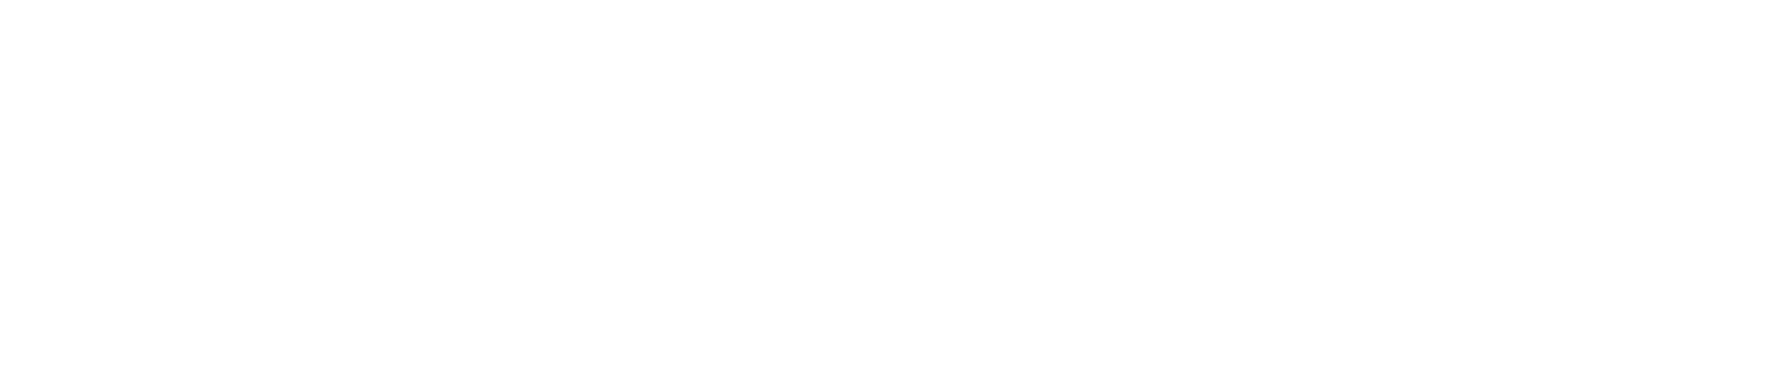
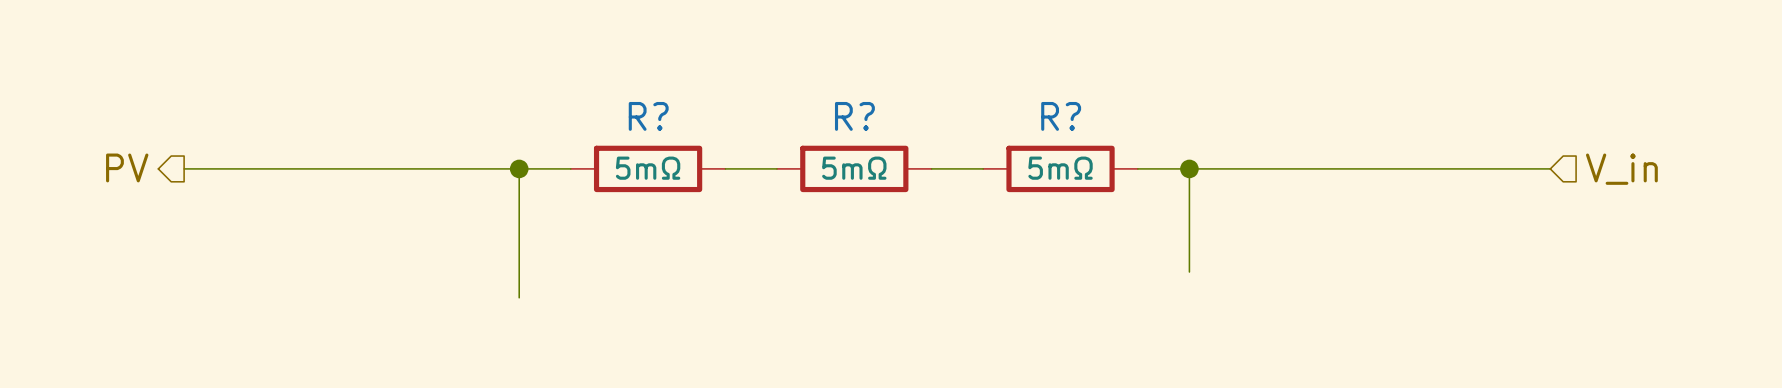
hierarchical label: none -> PV (127, 167)
wire: none -> (184, 168) (570, 168)
wire: none -> (519, 168) (519, 297)
junction: none -> (519, 168)
R?: none -> 5mΩ (648, 168)
wire: none -> (725, 168) (776, 168)
R?: none -> 5mΩ (854, 168)
wire: none -> (931, 168) (983, 168)
R?: none -> 5mΩ (1060, 168)
wire: none -> (1137, 168) (1550, 168)
wire: none -> (1189, 168) (1189, 272)
junction: none -> (1189, 168)
hierarchical label: none -> V_in (1621, 169)

